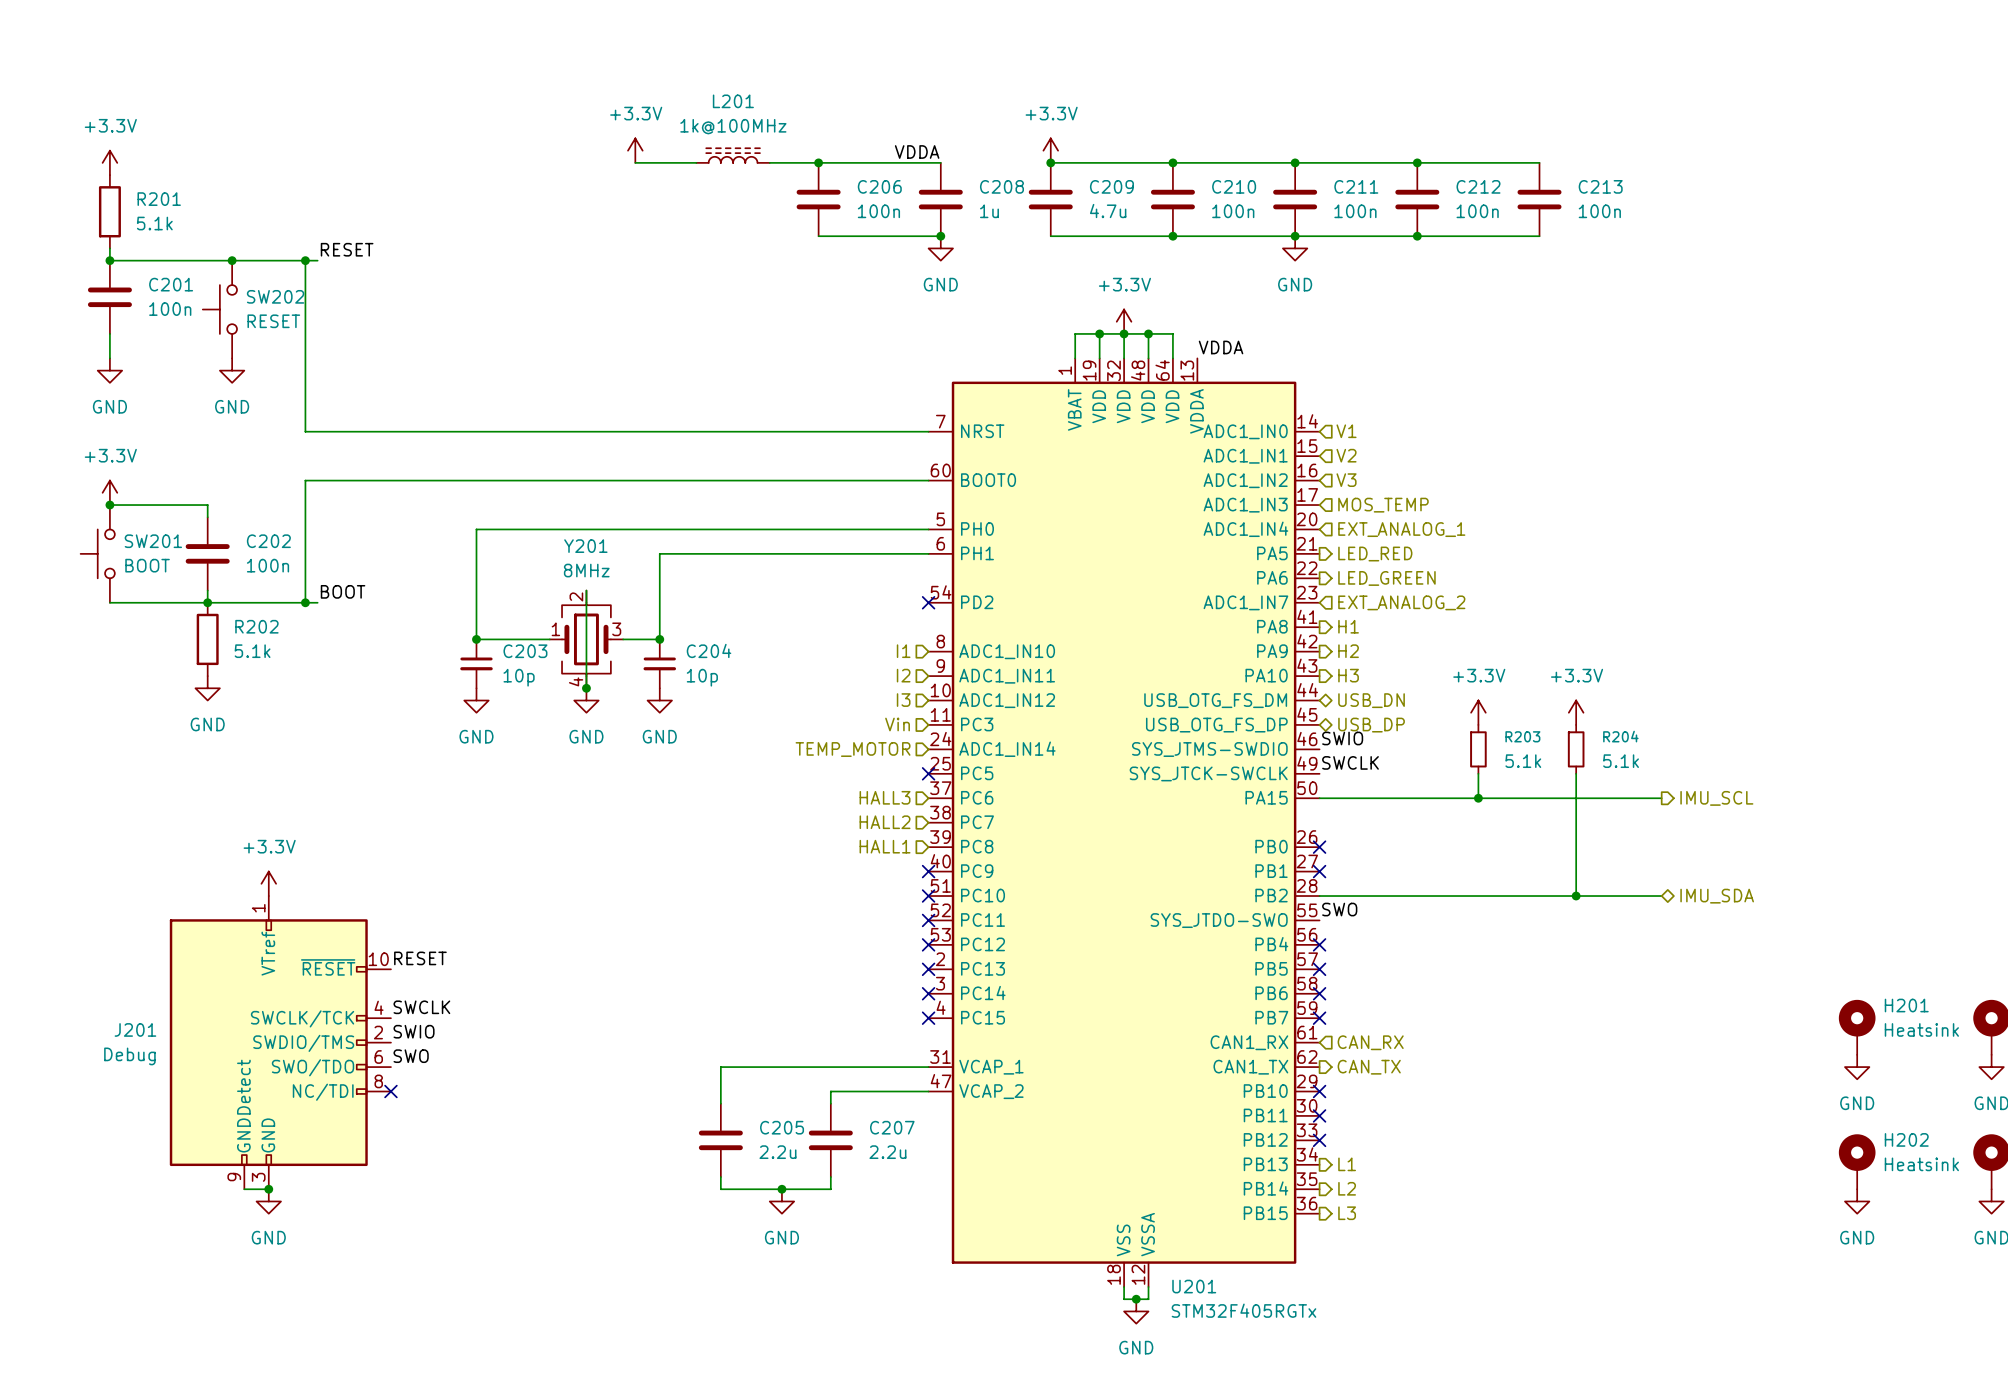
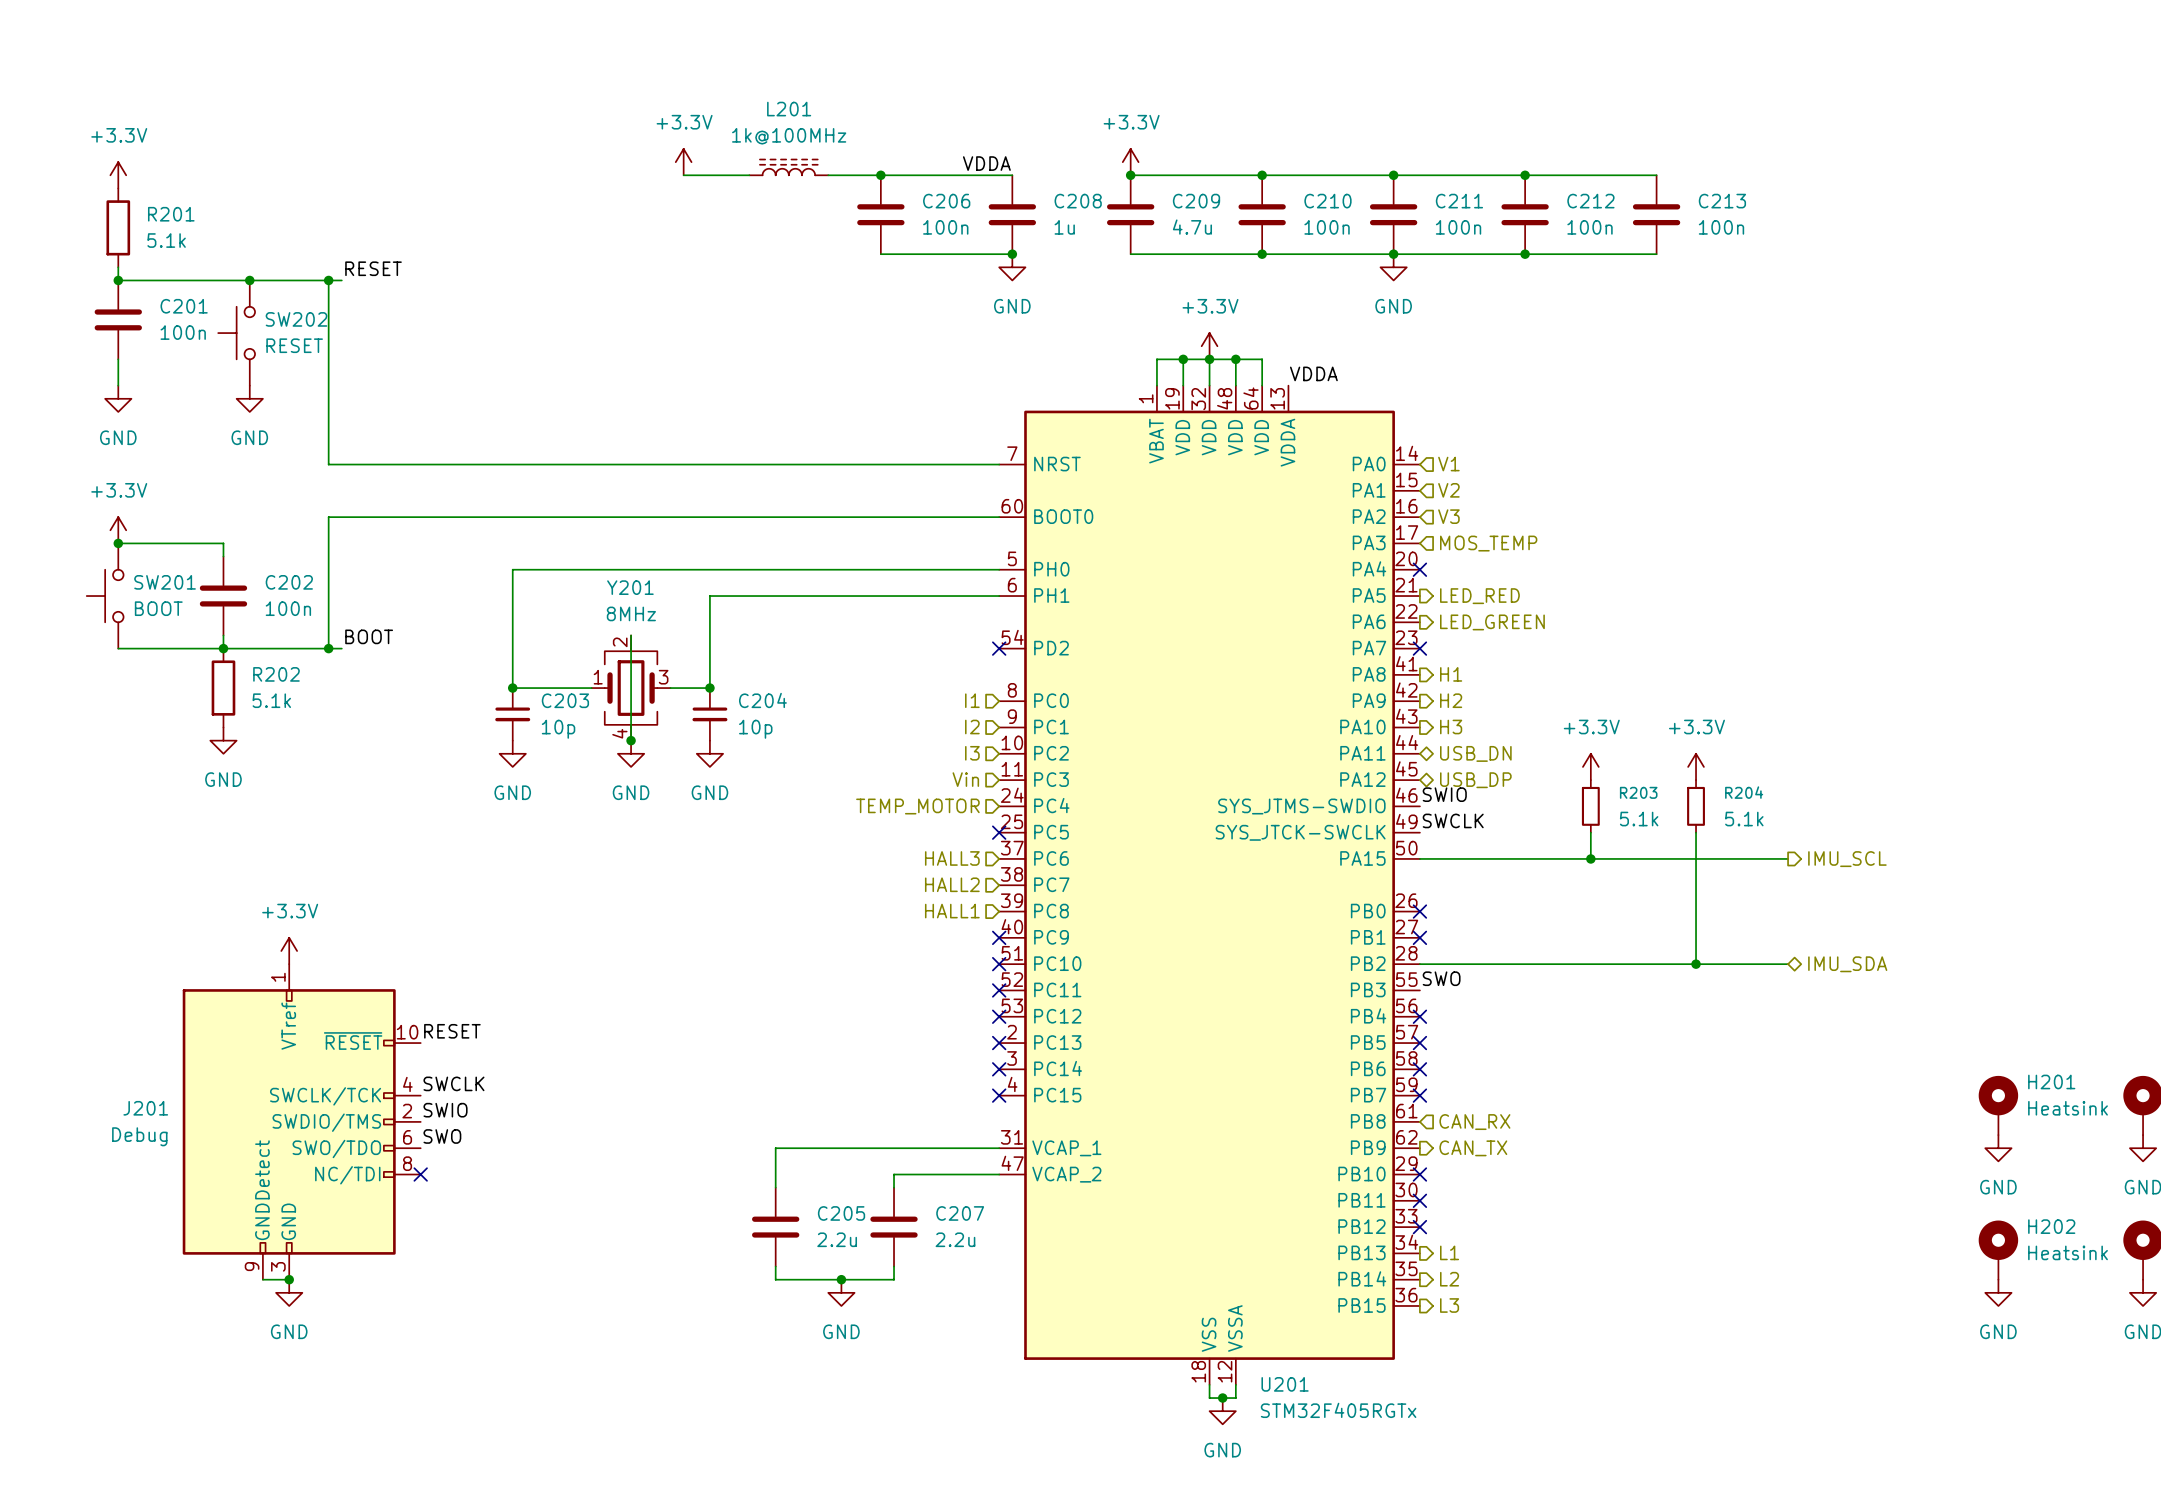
U201 symbol: [928, 358, 1320, 1288] -> [999, 385, 1420, 1385]
no-connect mark: none -> (1419, 569)
hierarchical label: EXT_ANALOG_1 (1401, 529) -> none
no-connect mark: none -> (1419, 648)
hierarchical label: EXT_ANALOG_2 (1401, 602) -> none

